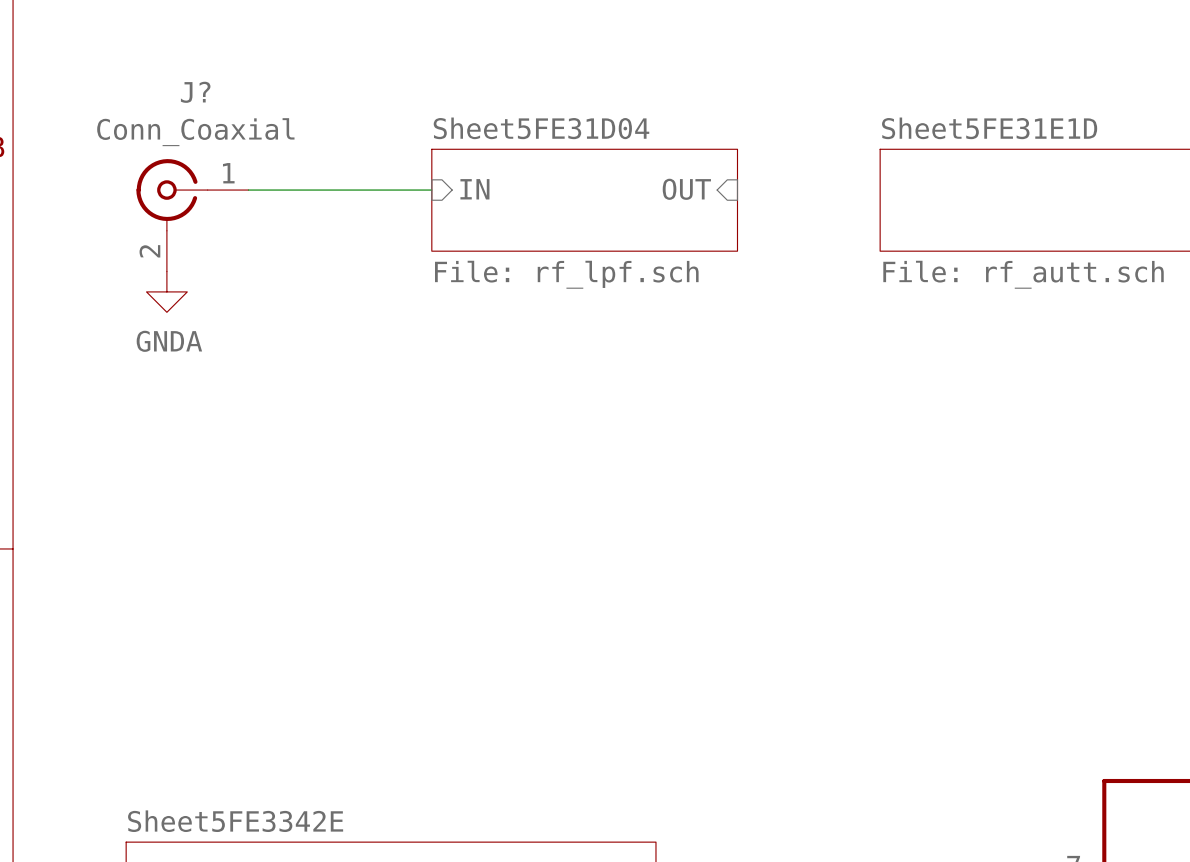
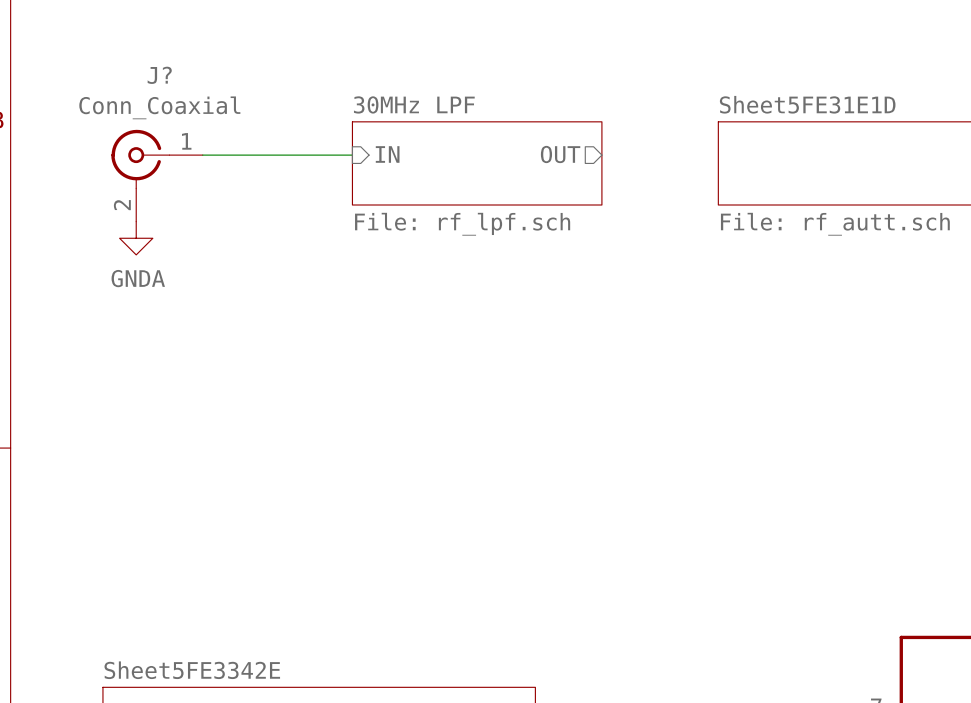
sheet Sheet5FE31D04 name: Sheet5FE31D04 (541, 128) -> 30MHz LPF (414, 104)
sheet pin shape: input (686, 189) -> output (560, 154)

